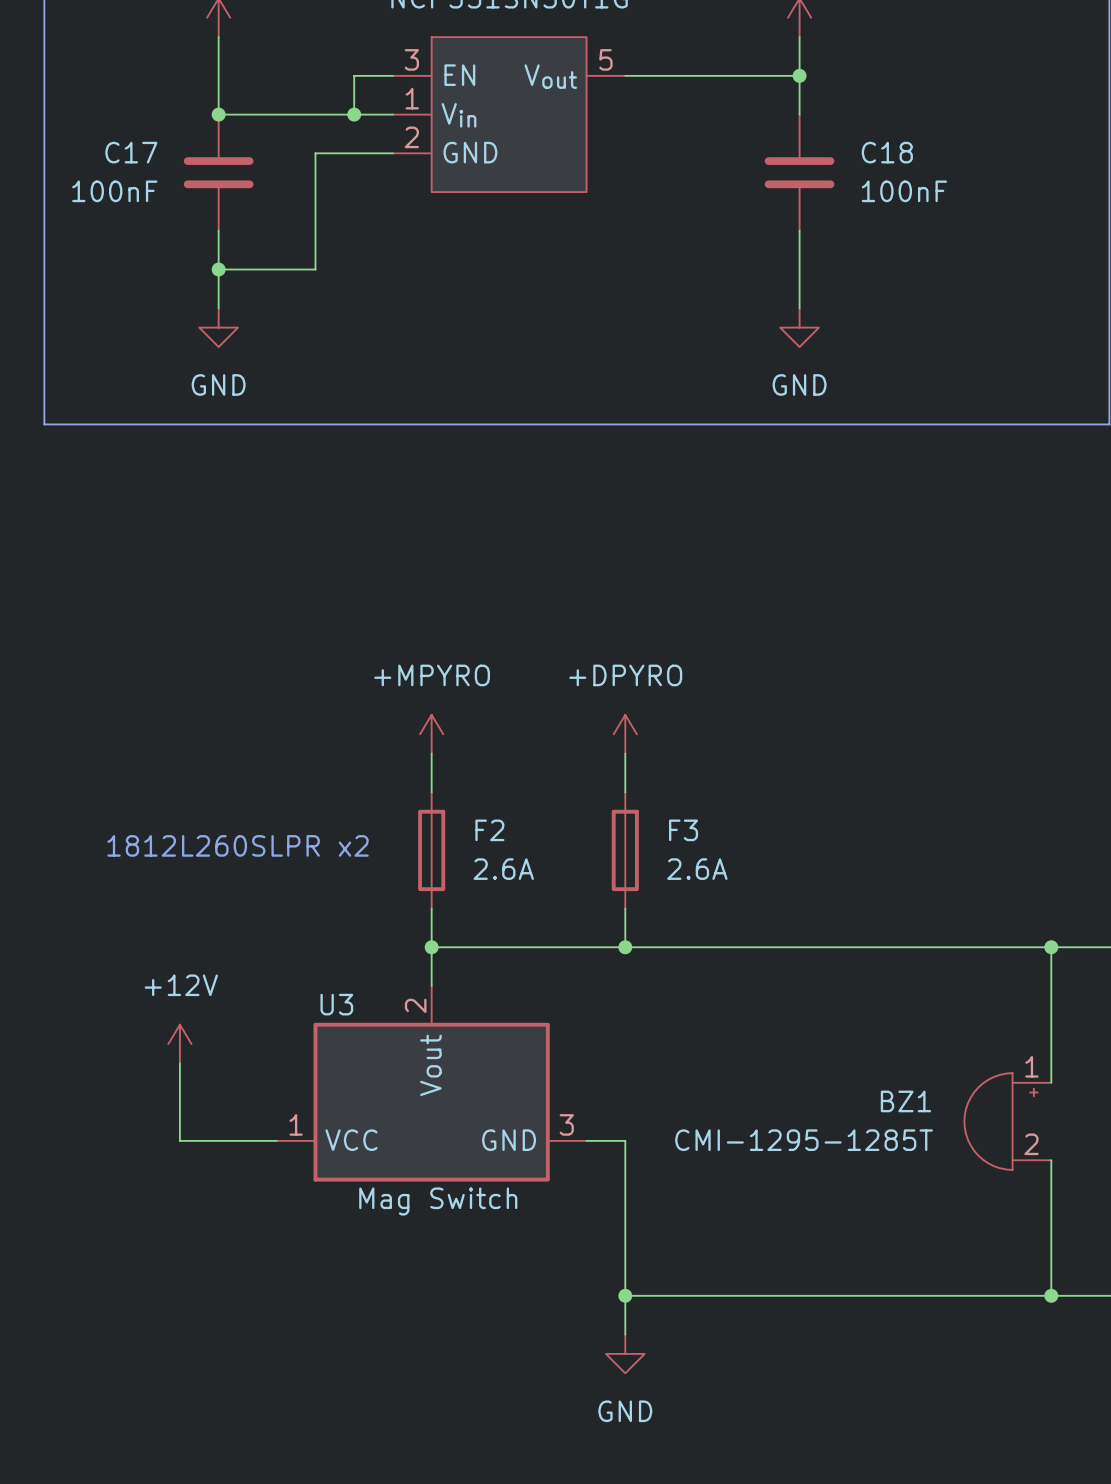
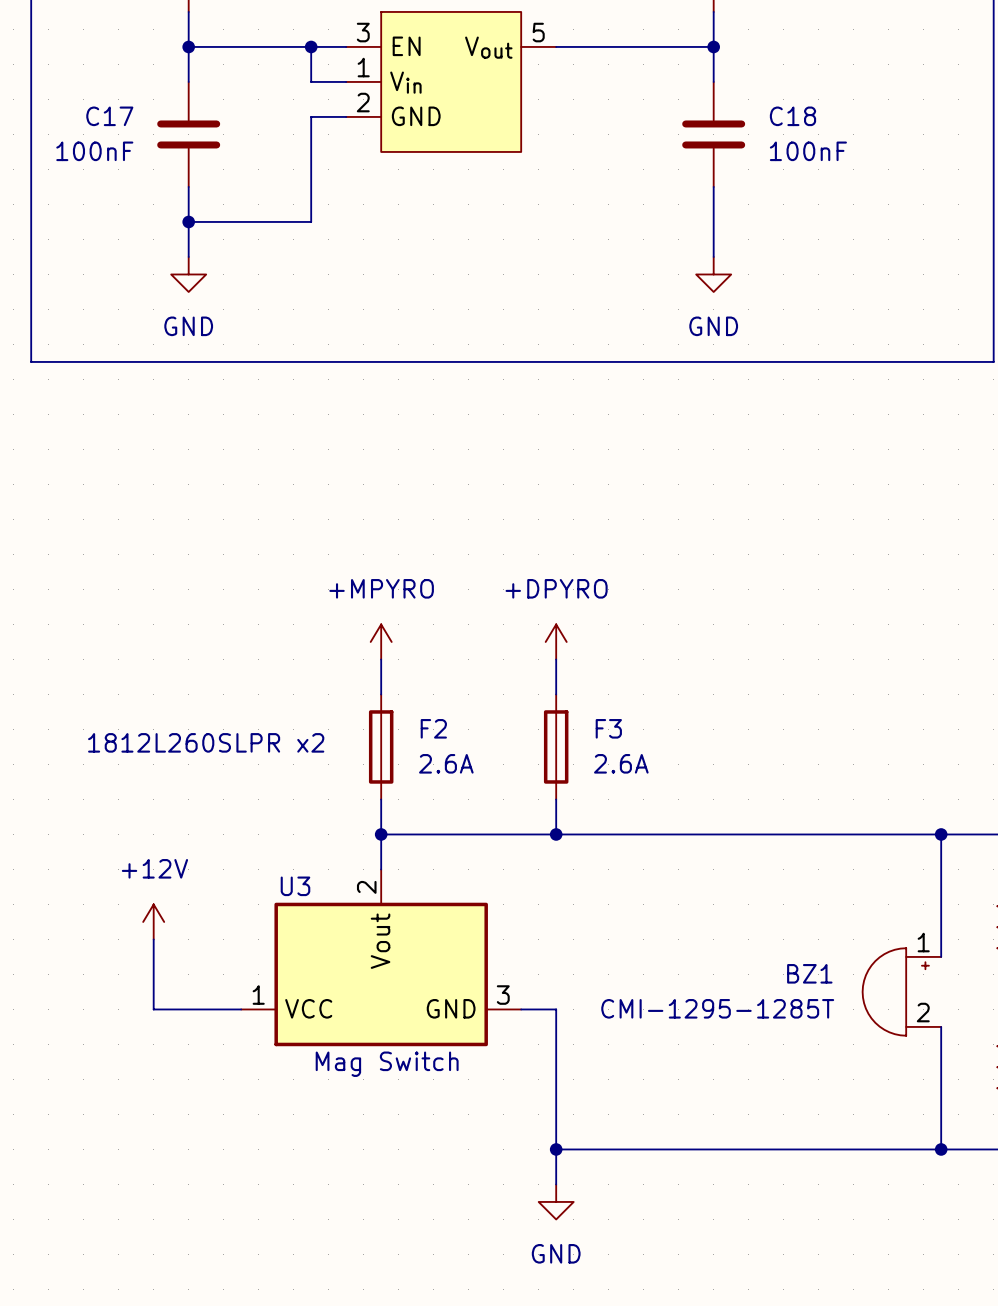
wire: (218, 114) (354, 114) -> (188, 46) (311, 46)
junction position: (218, 114) -> (188, 46)
junction position: (354, 114) -> (311, 46)
wire: (354, 153) (315, 153) (315, 269) -> (311, 116) (311, 221) (276, 221)

